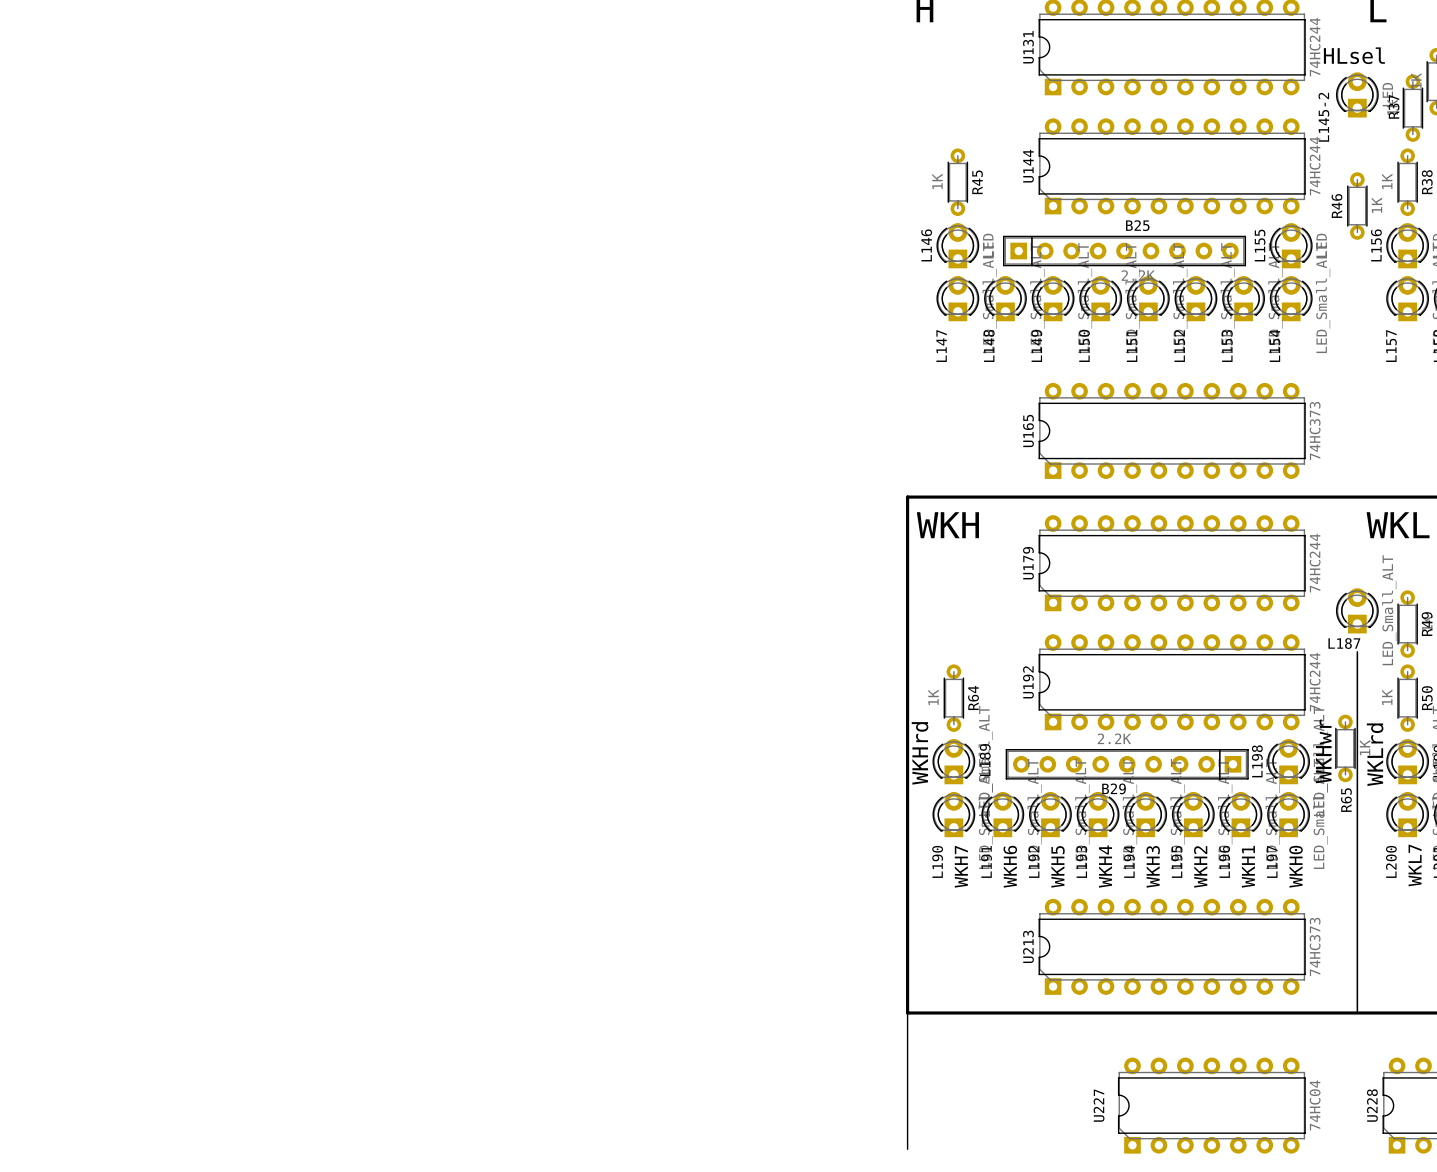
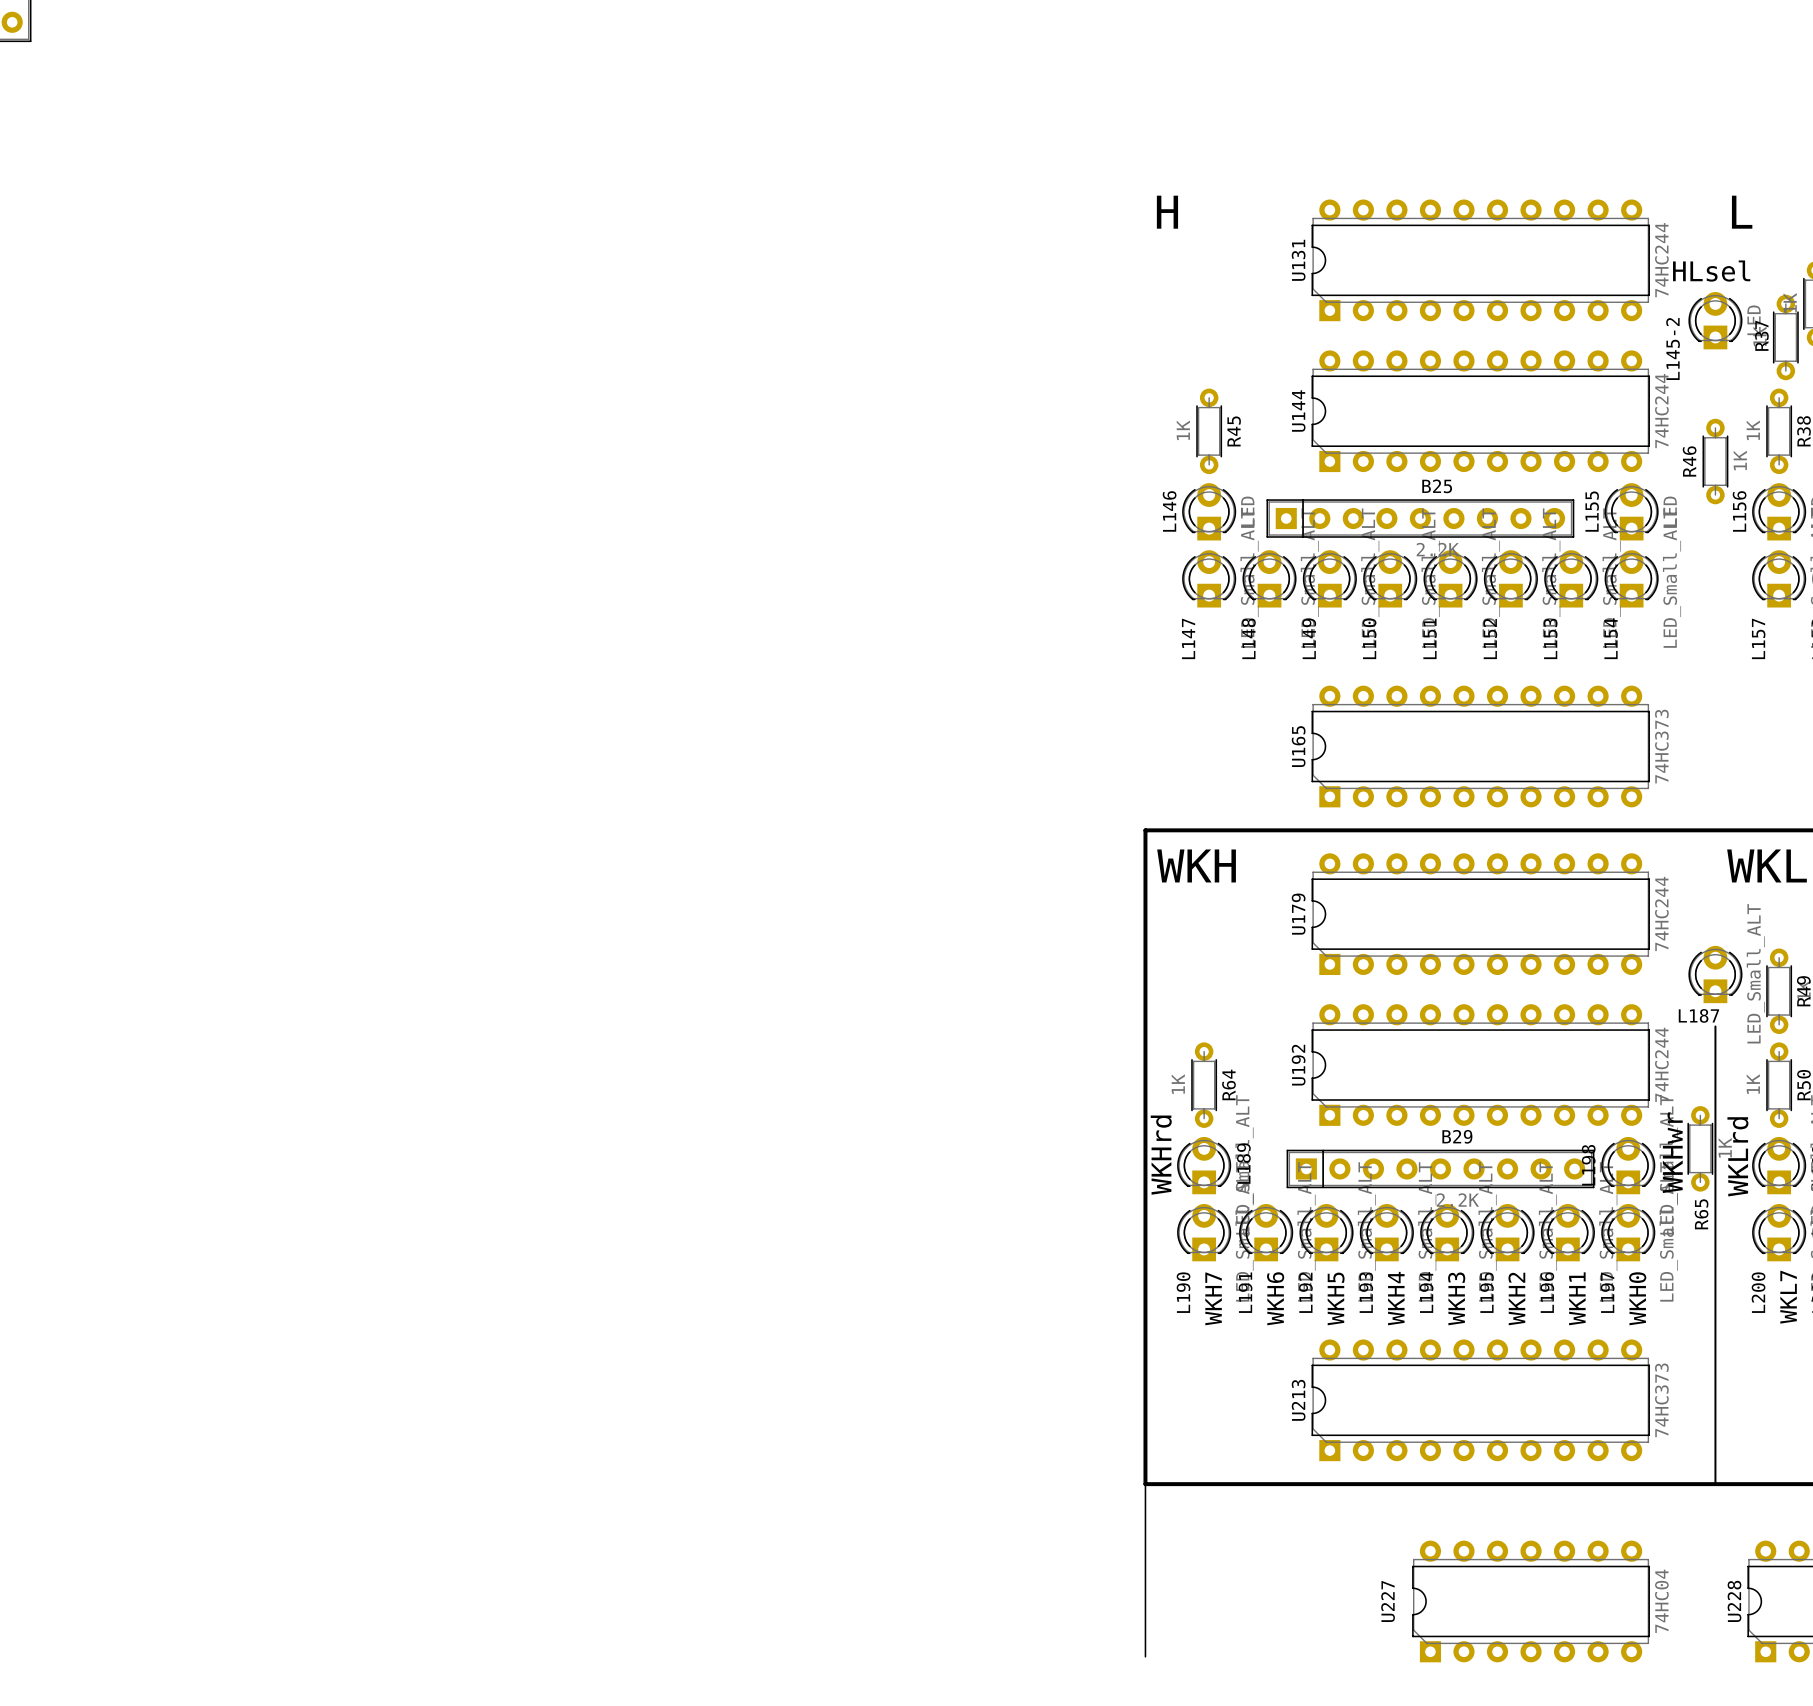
B29 rotation: 0° (1127, 764) -> 180° (1440, 1168)

